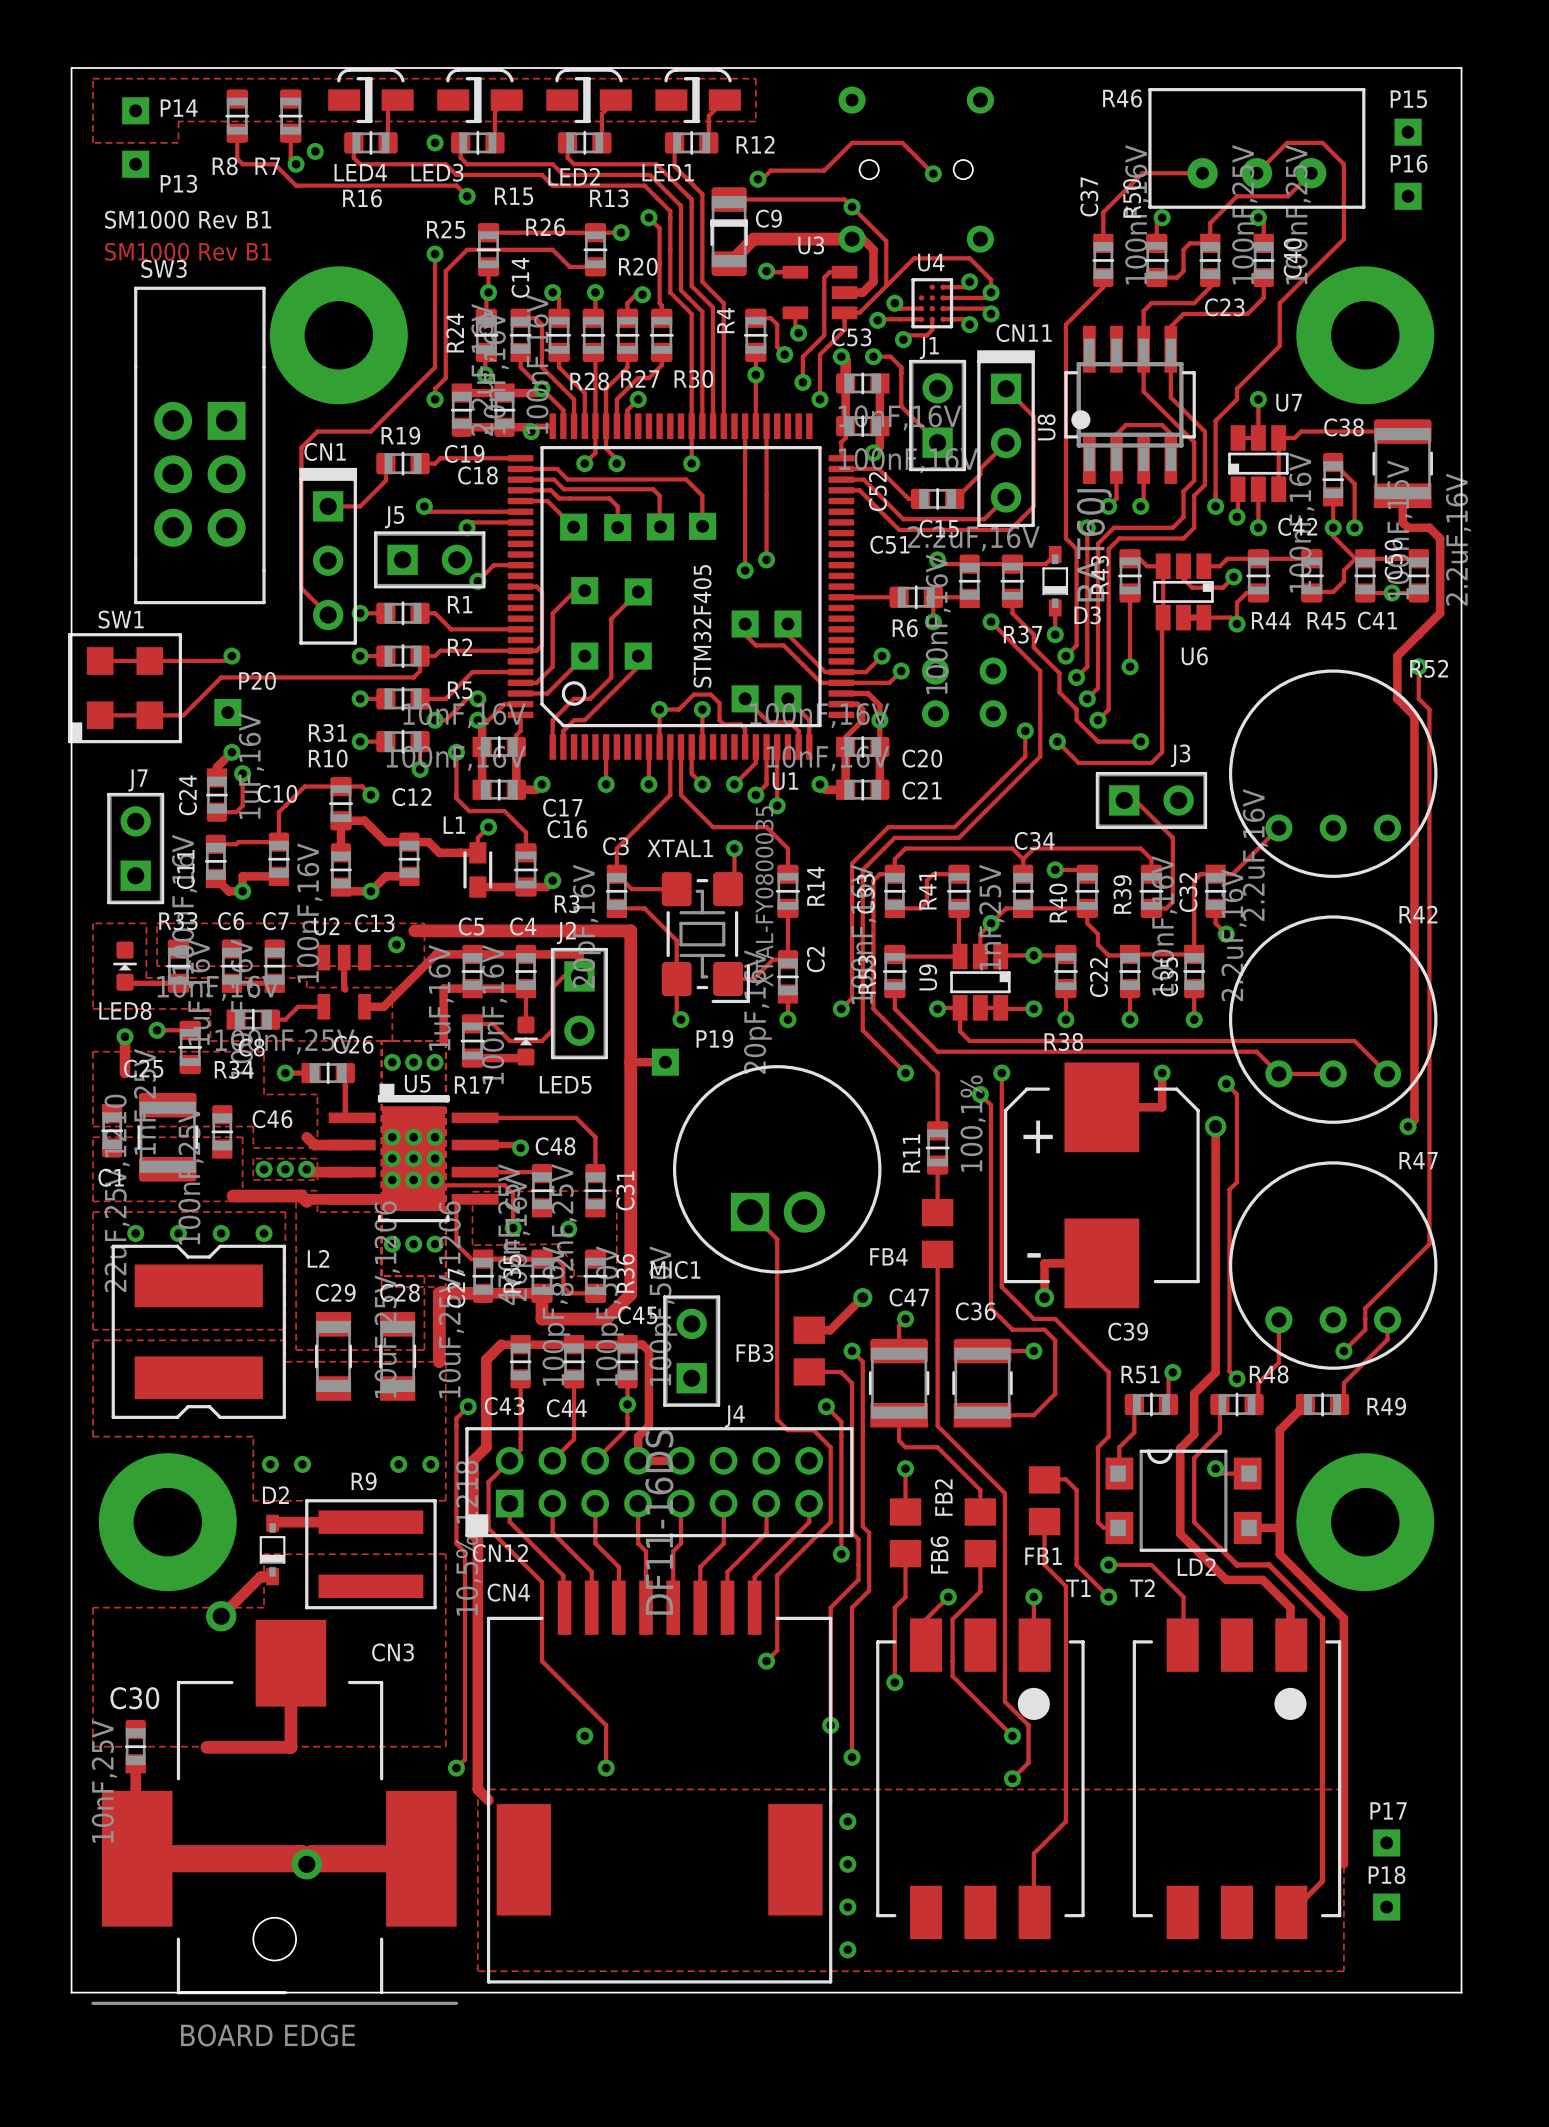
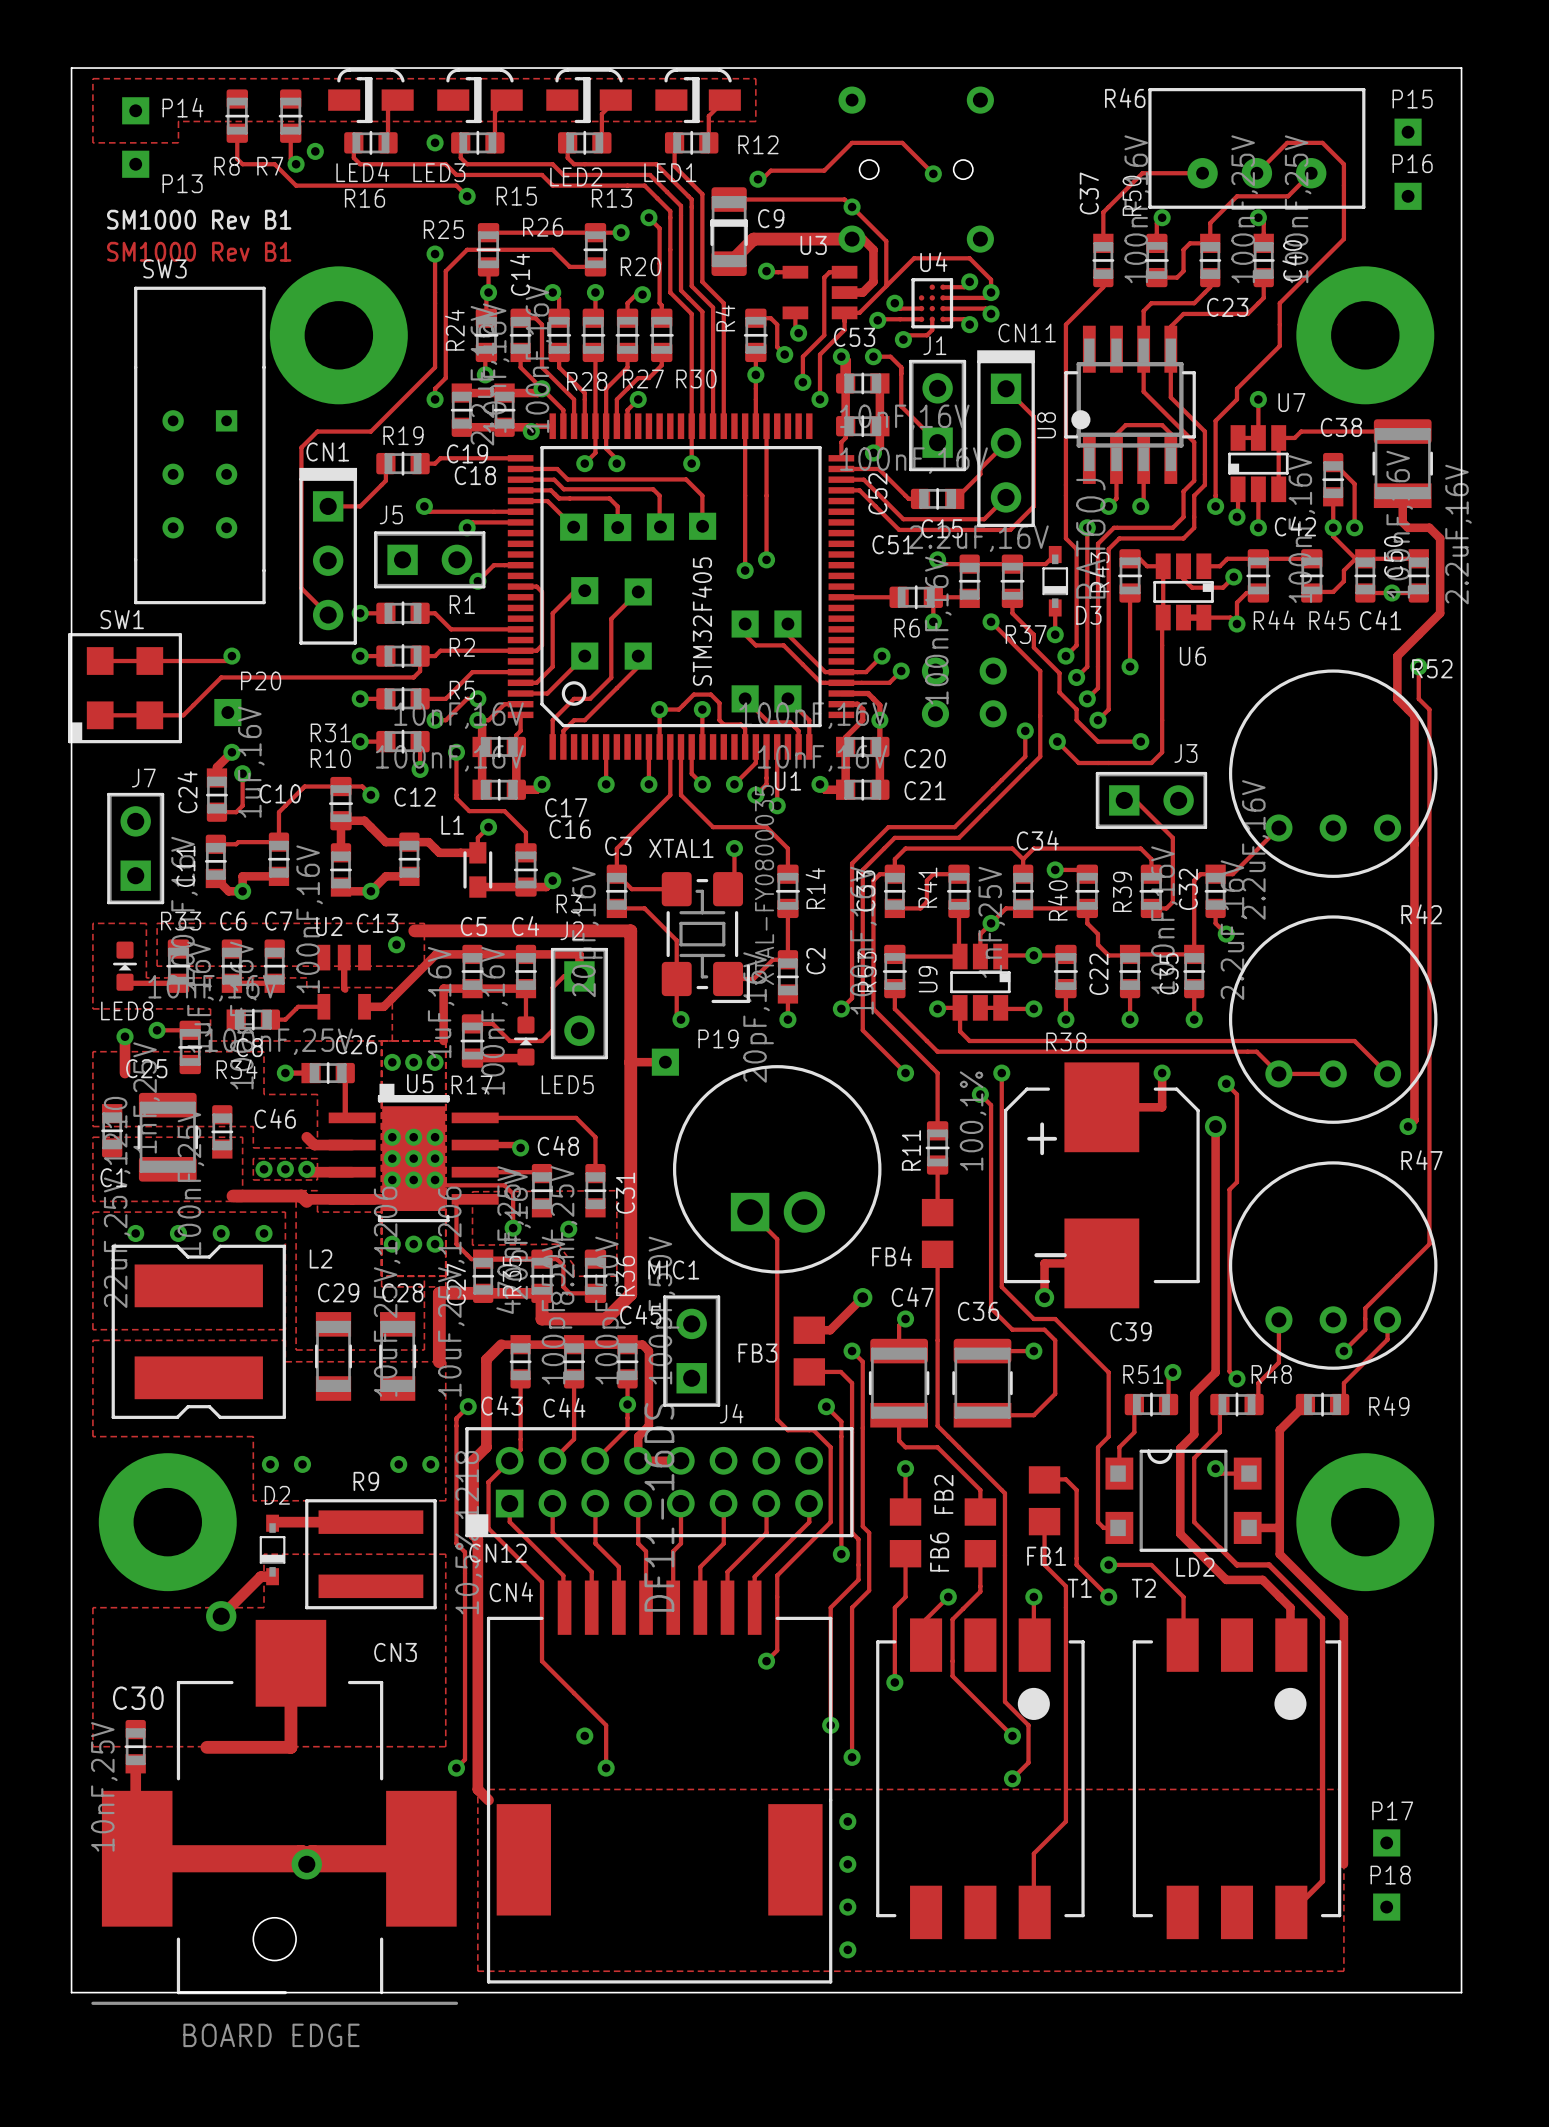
SW3 footprint: [134, 286, 266, 605] -> [134, 286, 266, 605]

